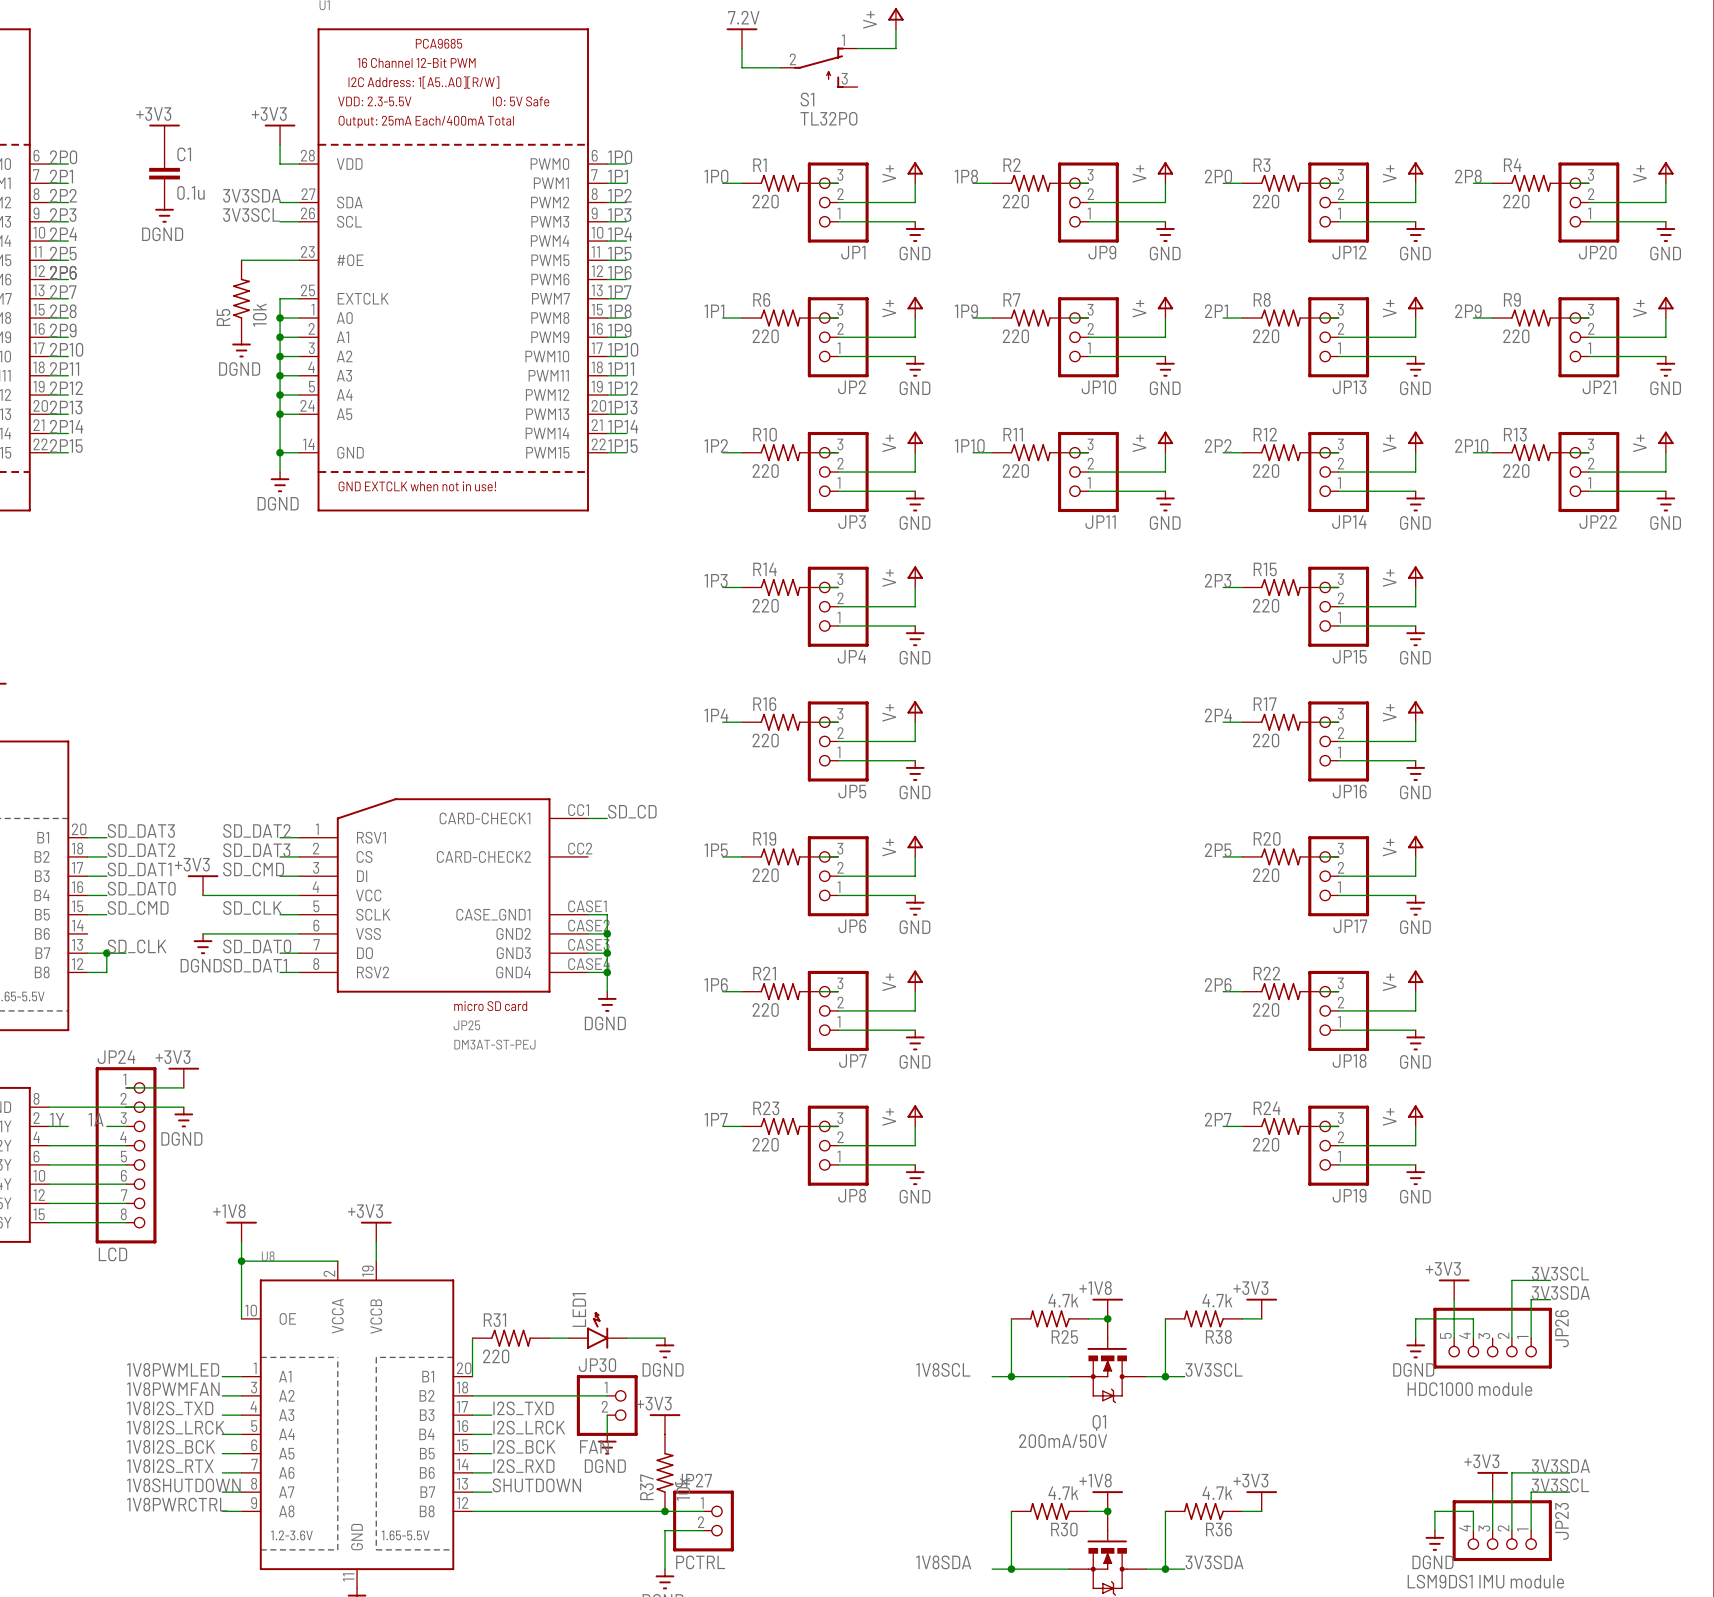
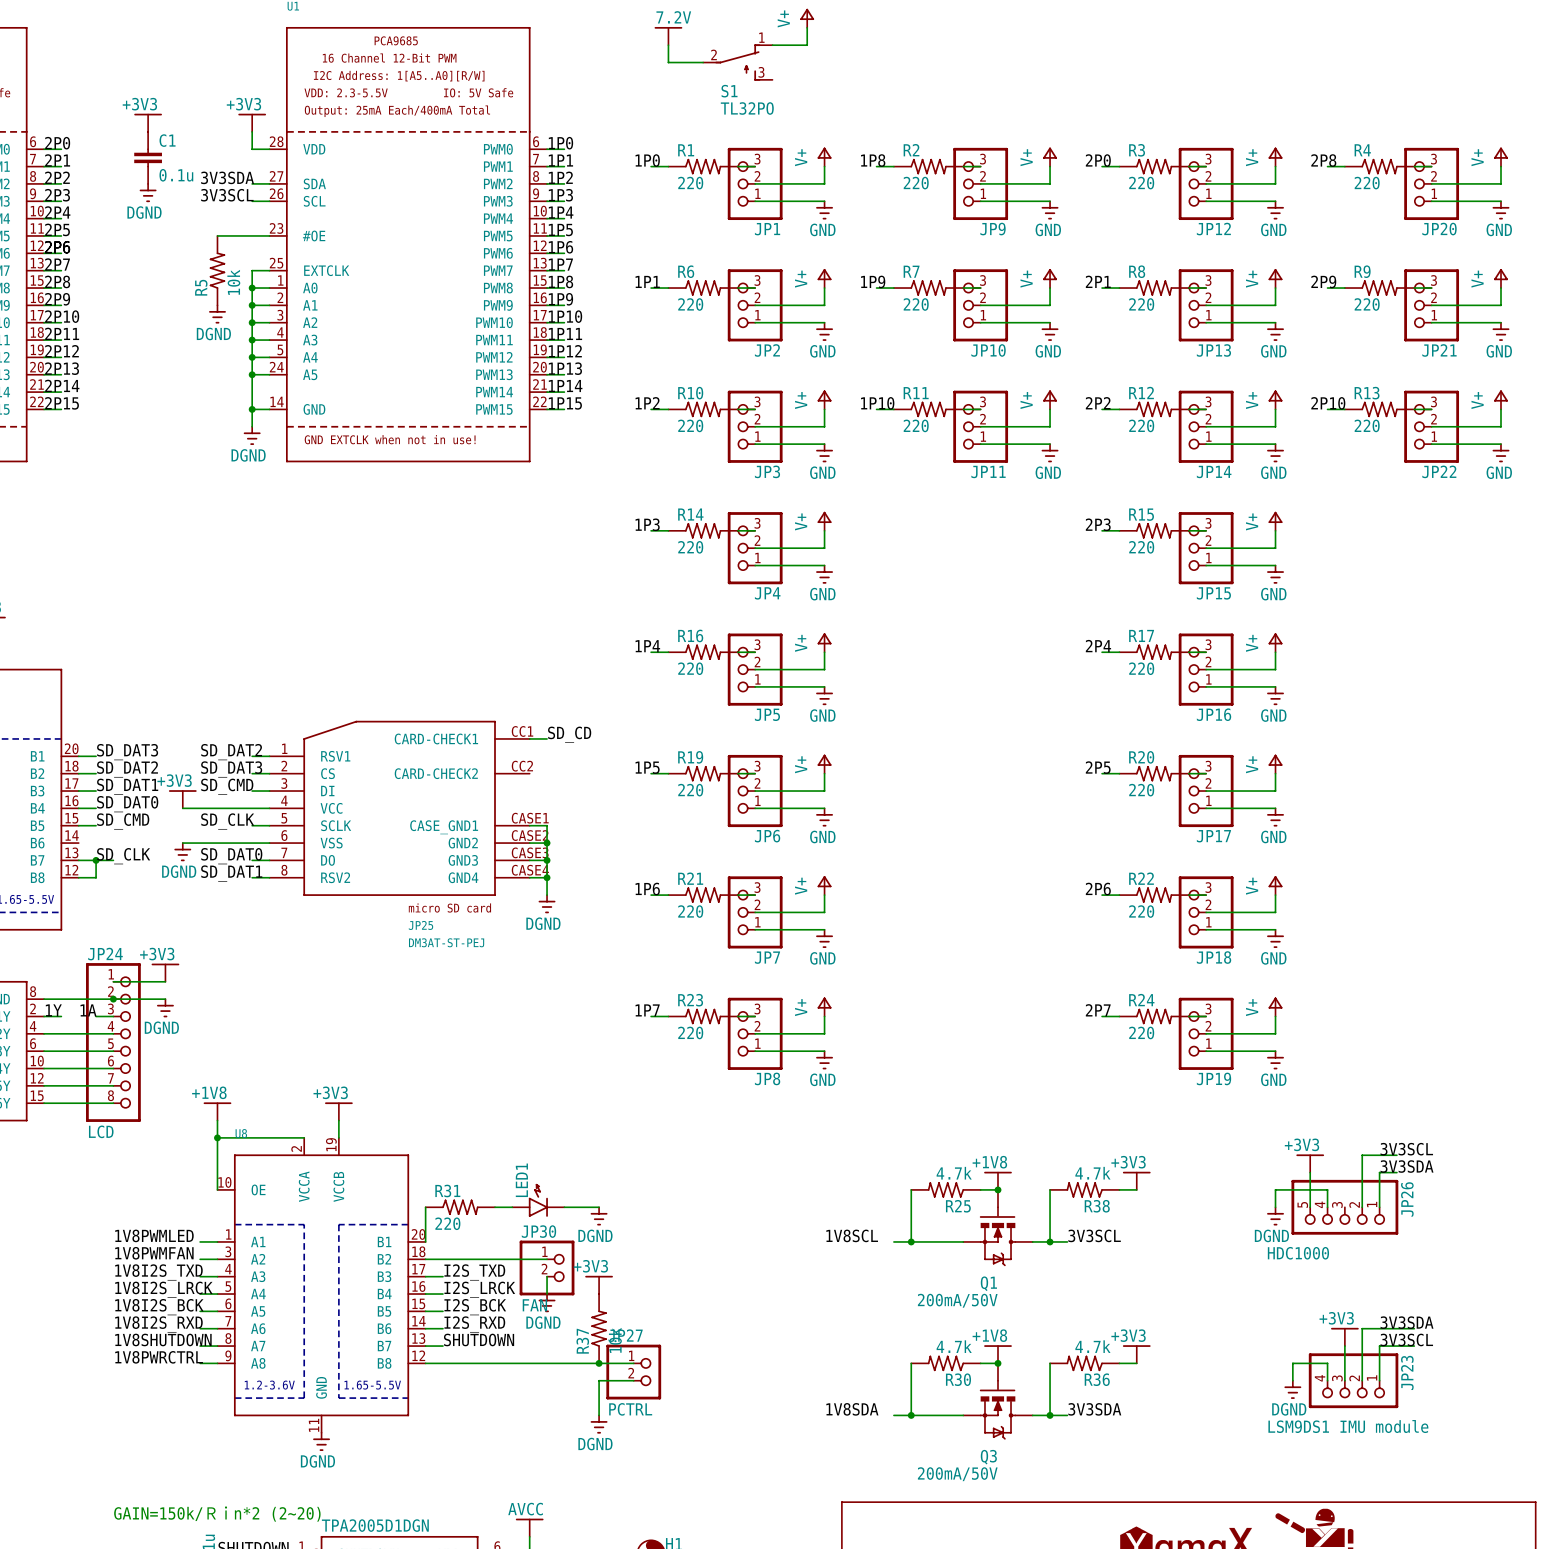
junction: none -> (113, 999)
JP26 value: HDC1000 module (1469, 1389) -> HDC1000 (1298, 1253)
label: 1V8I2S_RTX (170, 1466) -> 1V8I2S_RXD (158, 1324)

